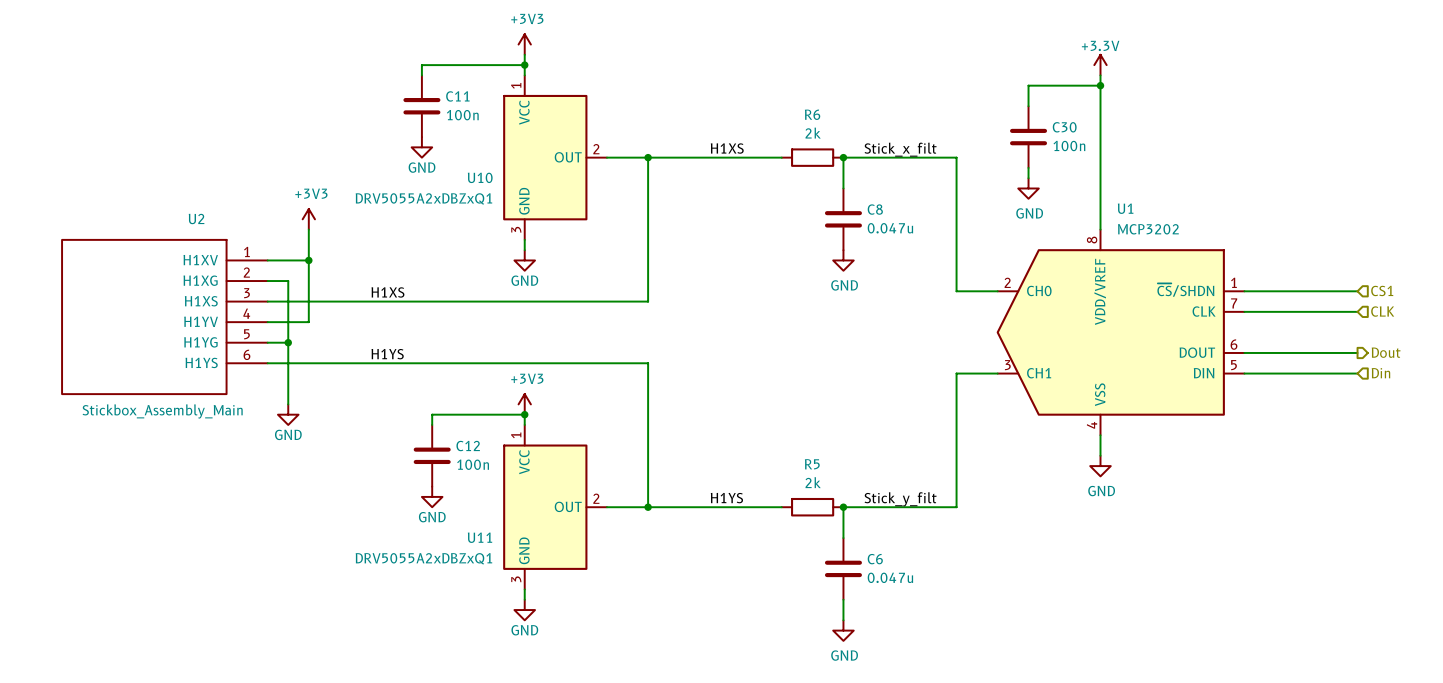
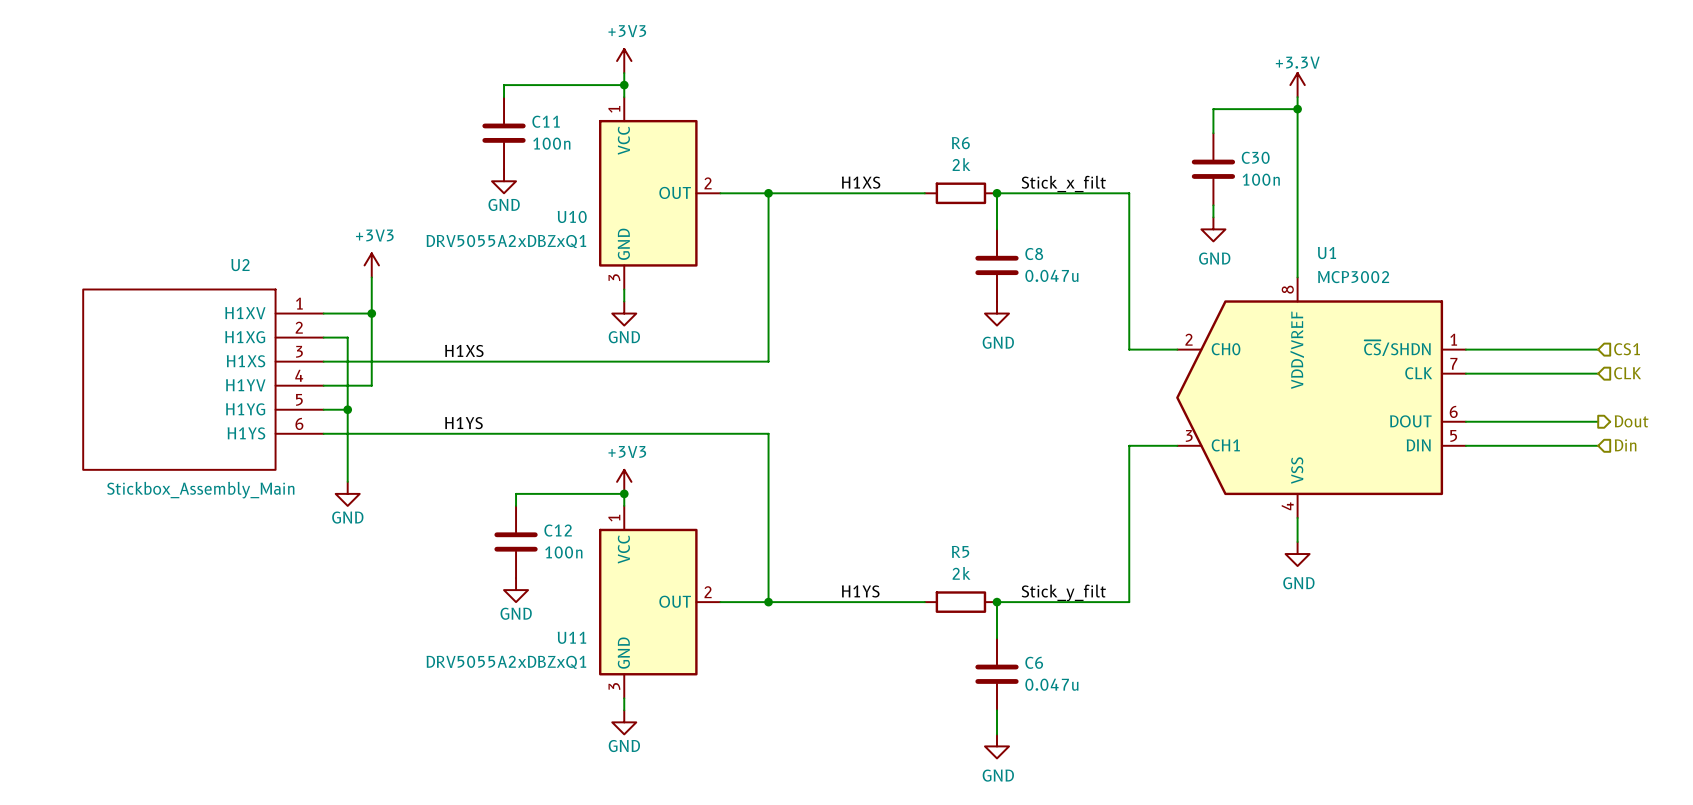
U1 value: MCP3202 (1148, 229) -> MCP3002 (1353, 277)

